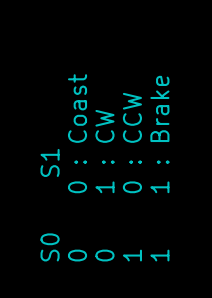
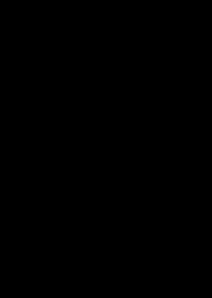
text: 0 0 : Coast (77, 167) -> none
text: 1 1 : Brake (159, 168) -> none
text: 1 0 : CCW (132, 177) -> none
text: 0 1 : CW (104, 185) -> none
text: S0 S1 (50, 205) -> none

